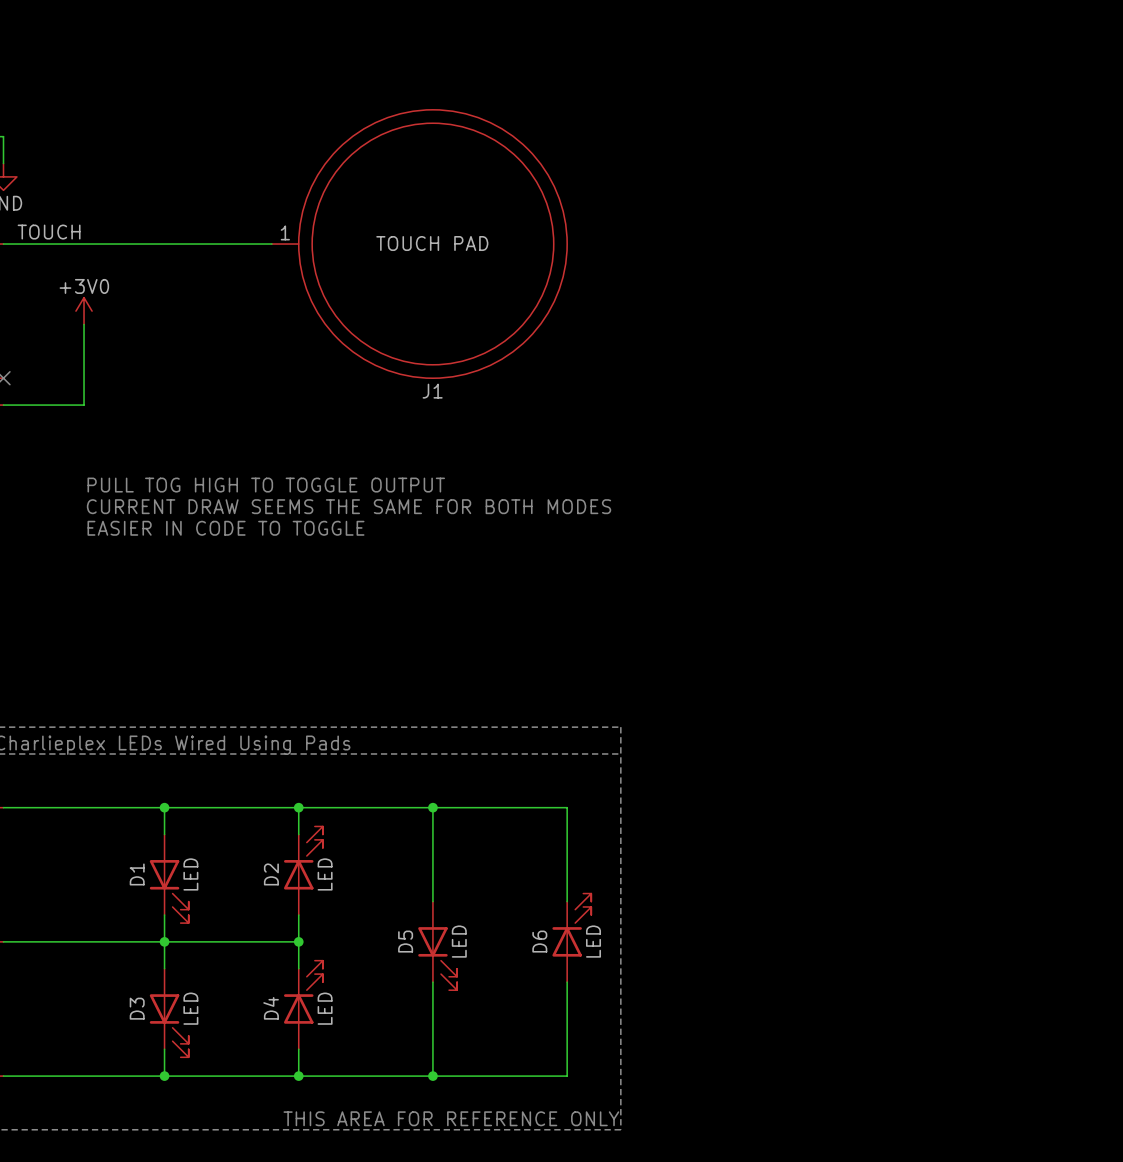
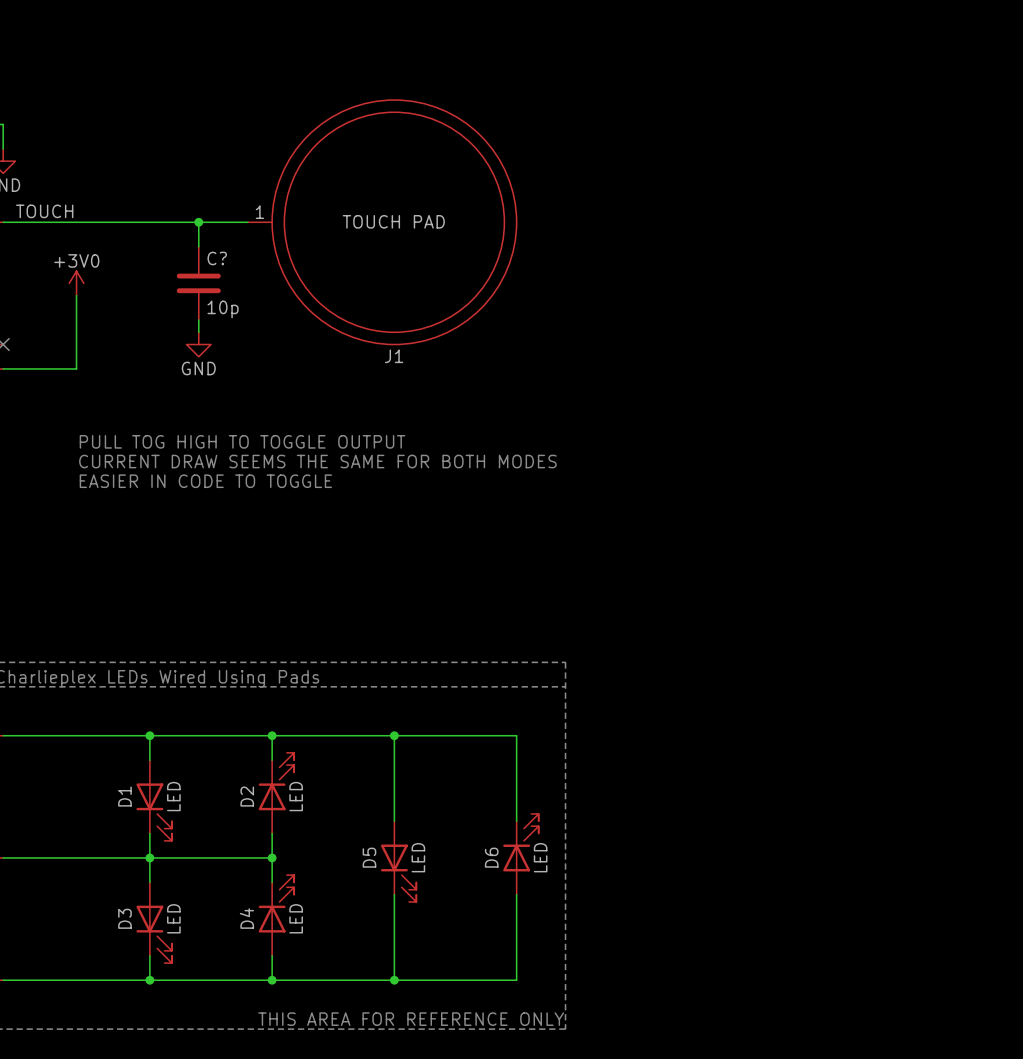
wire: none -> (198, 222) (198, 246)
junction: none -> (198, 222)
C?: none -> 10p (198, 283)
wire: none -> (198, 320) (198, 332)
power symbol: none -> GND (198, 344)

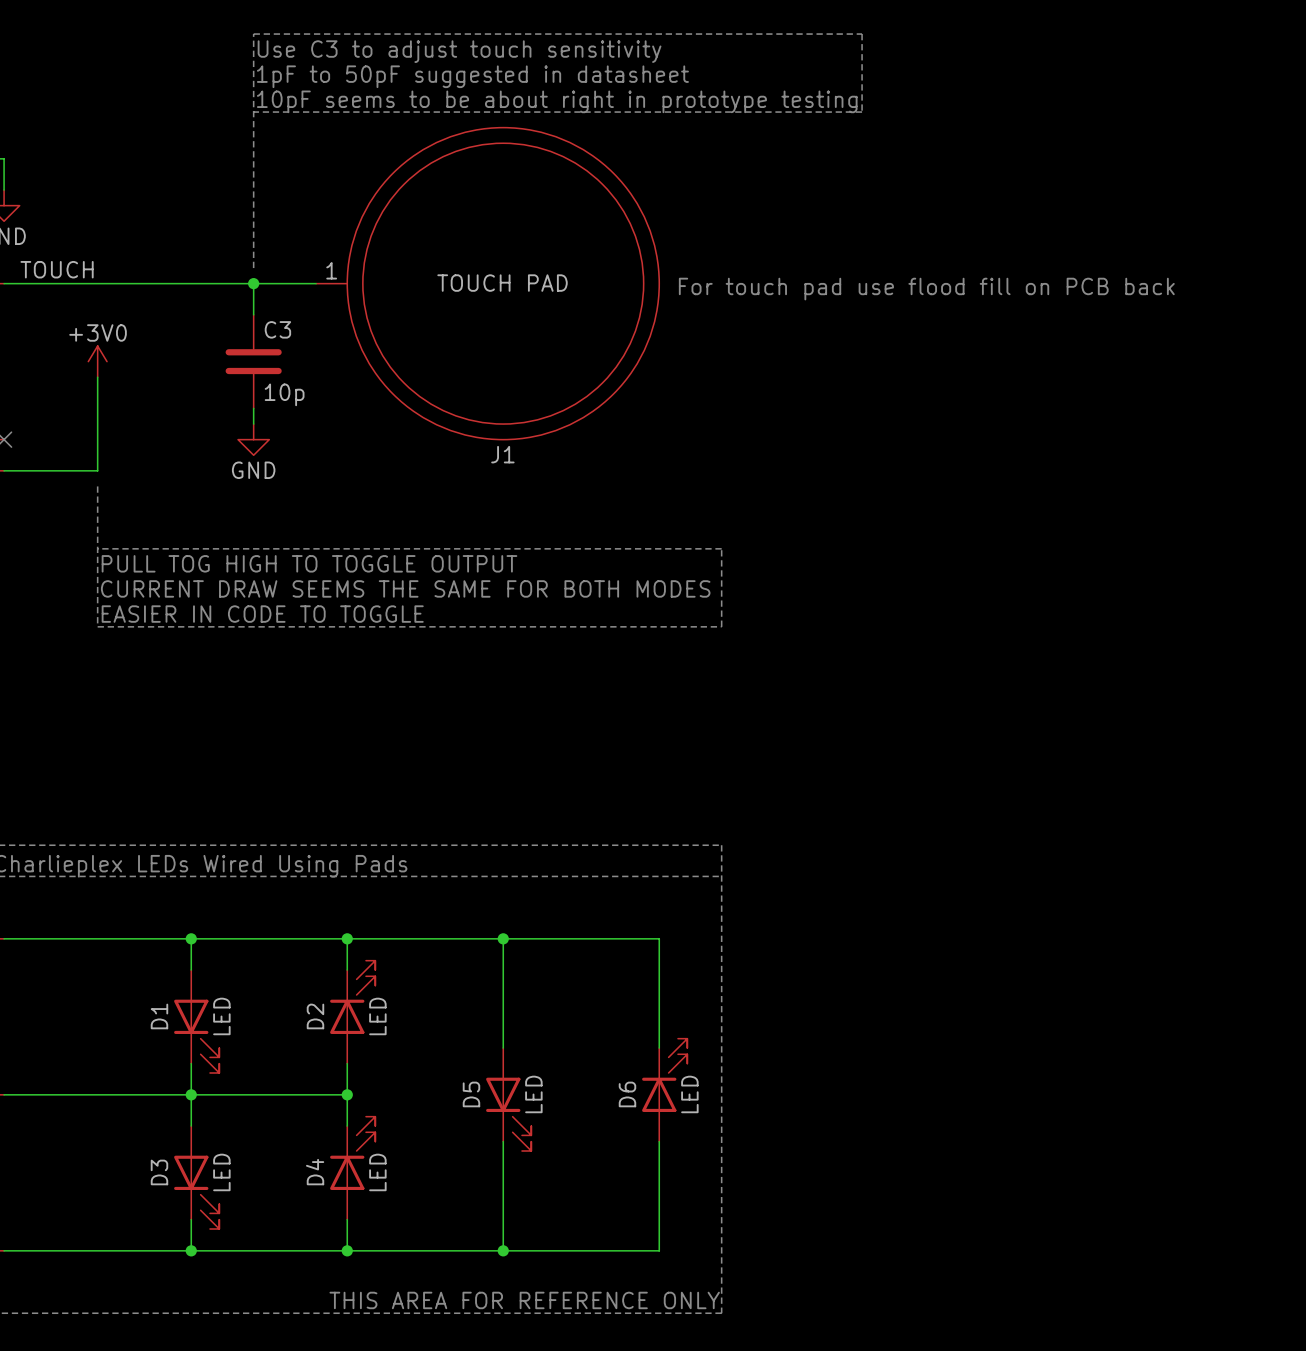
text: none -> Use C3 to adjust touch sensitivity (459, 51)
text: none -> 1pF to 50pF suggested in datasheet (472, 76)
text: none -> 10pF seems to be about right in prototype testing (557, 101)
line: none -> (253, 112) (862, 112) (862, 34) (253, 34) (253, 268)
text: none -> For touch pad use flood fill on PCB back (926, 289)
C? name: C? (217, 258) -> C3 (277, 329)
line: none -> (97, 486) (97, 626) (721, 626) (721, 548) (97, 548)

